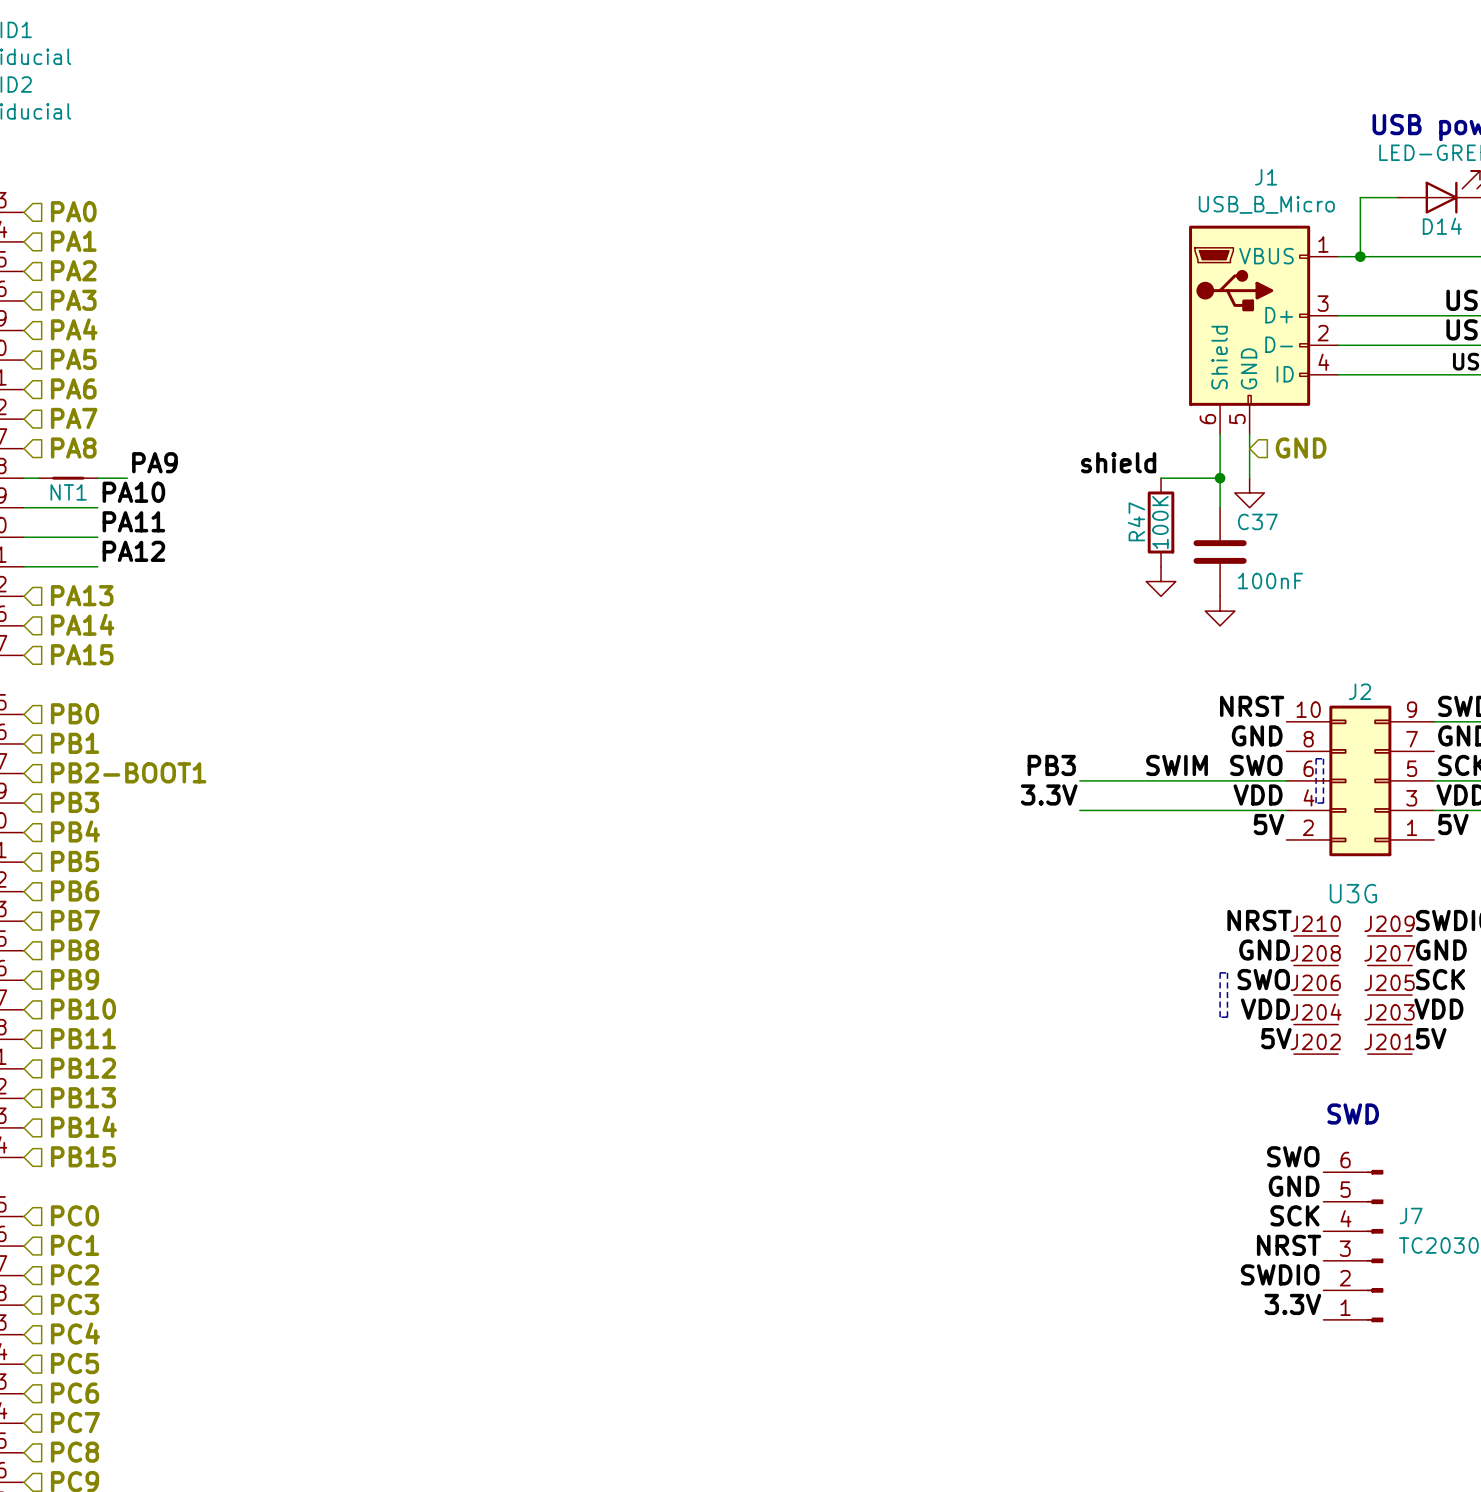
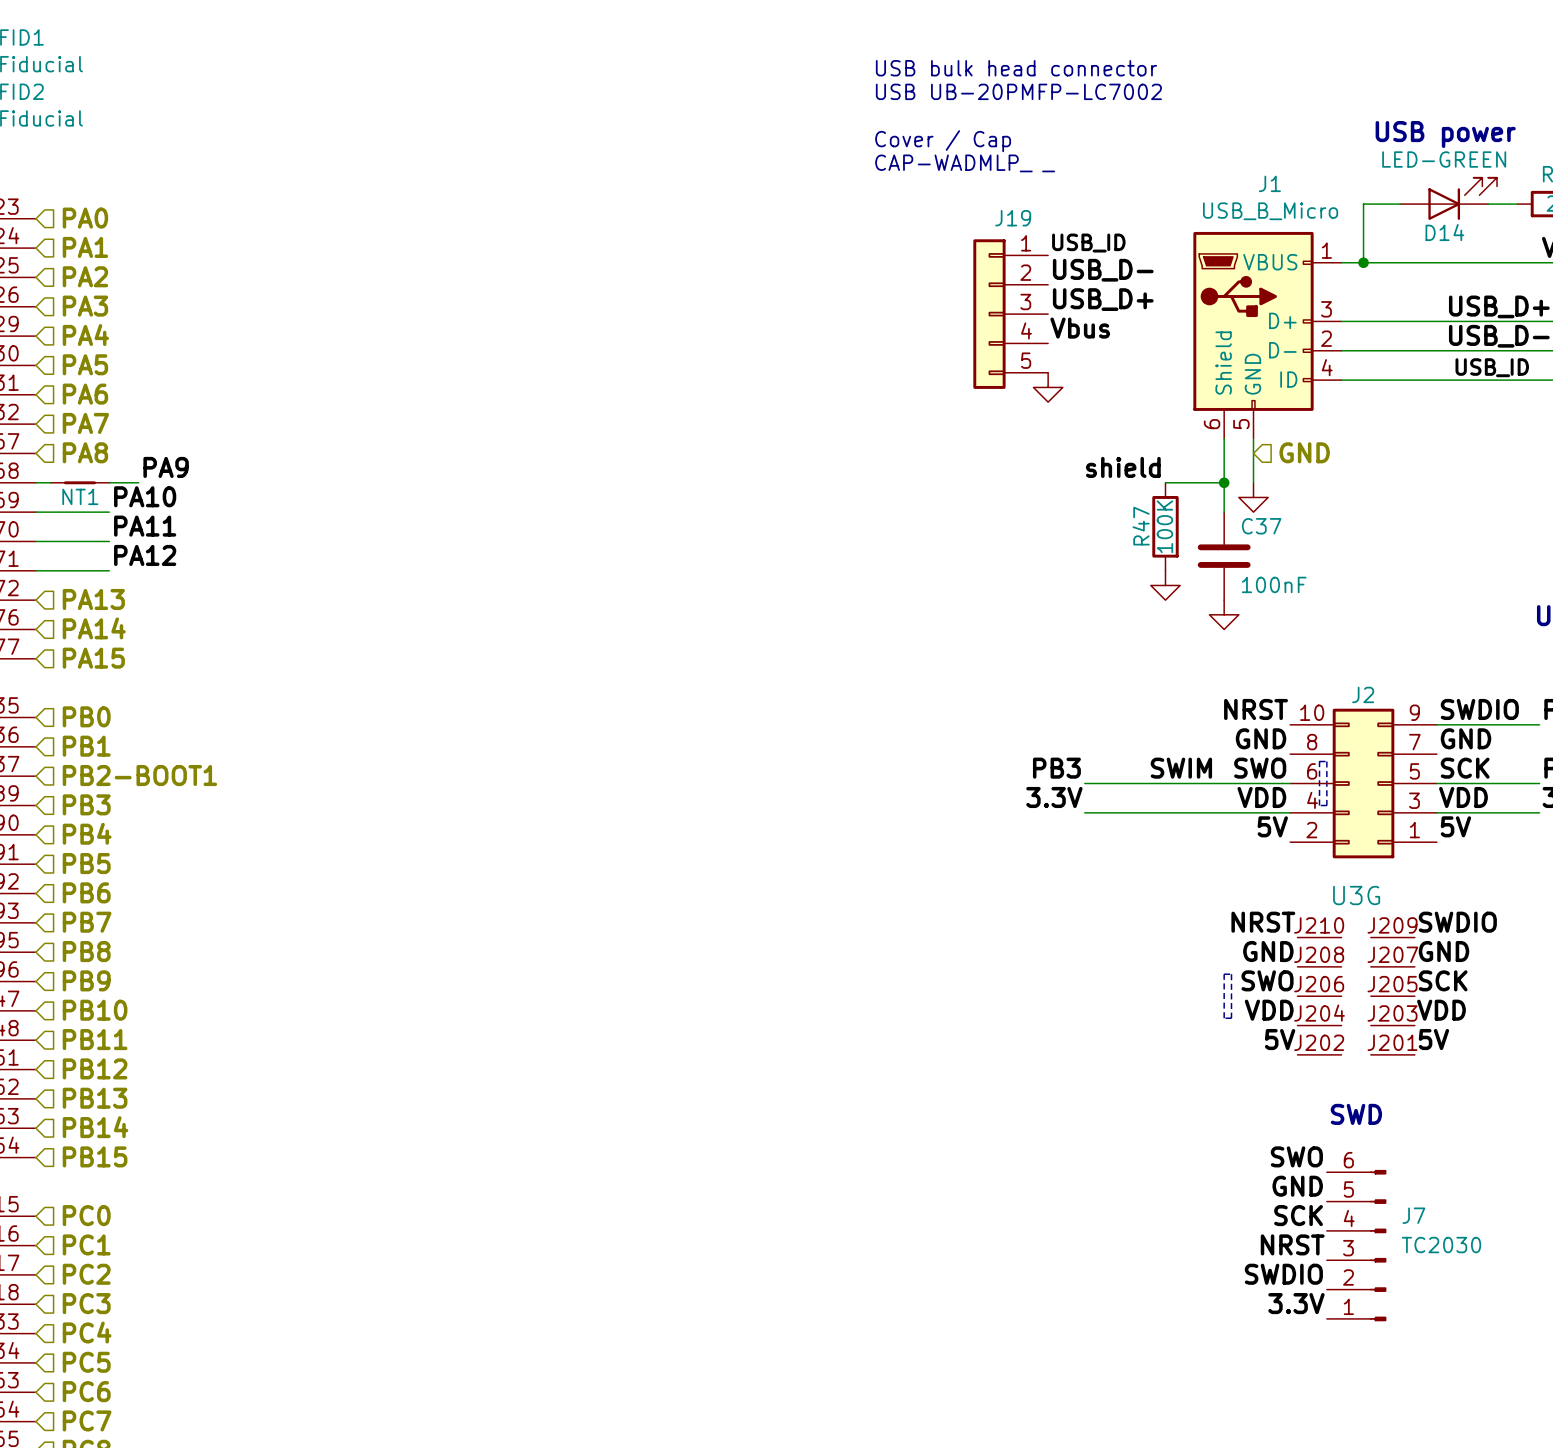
text: none -> USB bulk head connector (1016, 68)
text: none -> USB UB-20PMFP-LC7002 (1018, 91)
text: none -> Cover / Cap (943, 141)
text: none -> CAP-WADMLP_ _ (965, 163)
label: none -> USB_ID (1088, 243)
label: none -> USB_D- (1103, 270)
label: none -> USB_D+ (1103, 299)
J19: none -> (1010, 314)
label: none -> Vbus (1080, 328)
power symbol: none -> (1048, 387)

